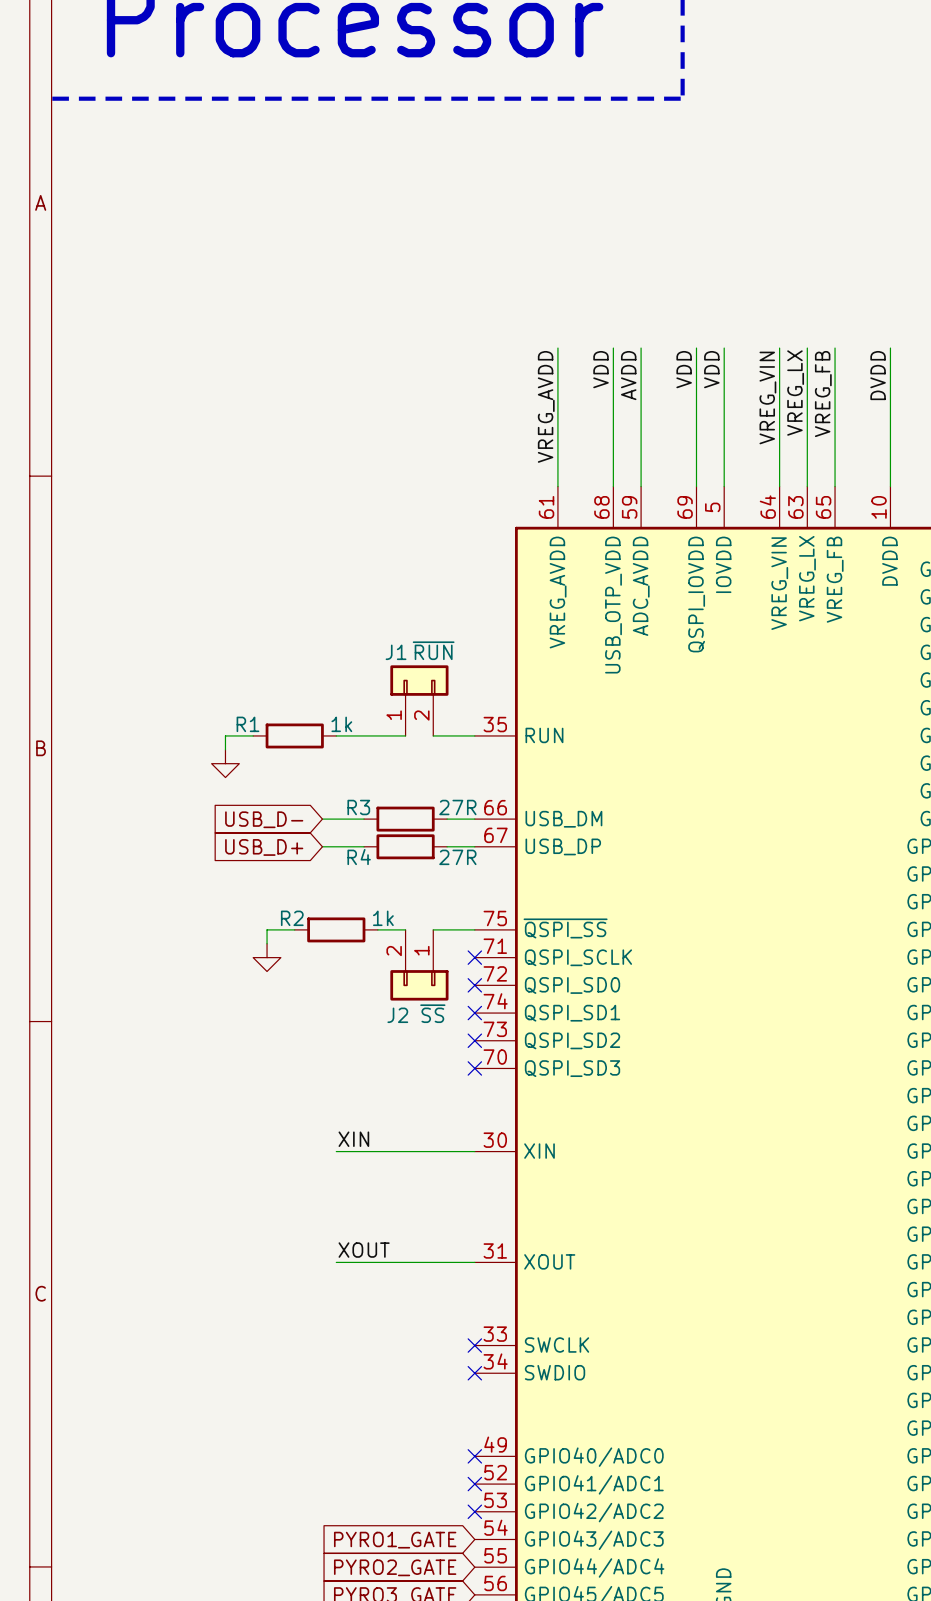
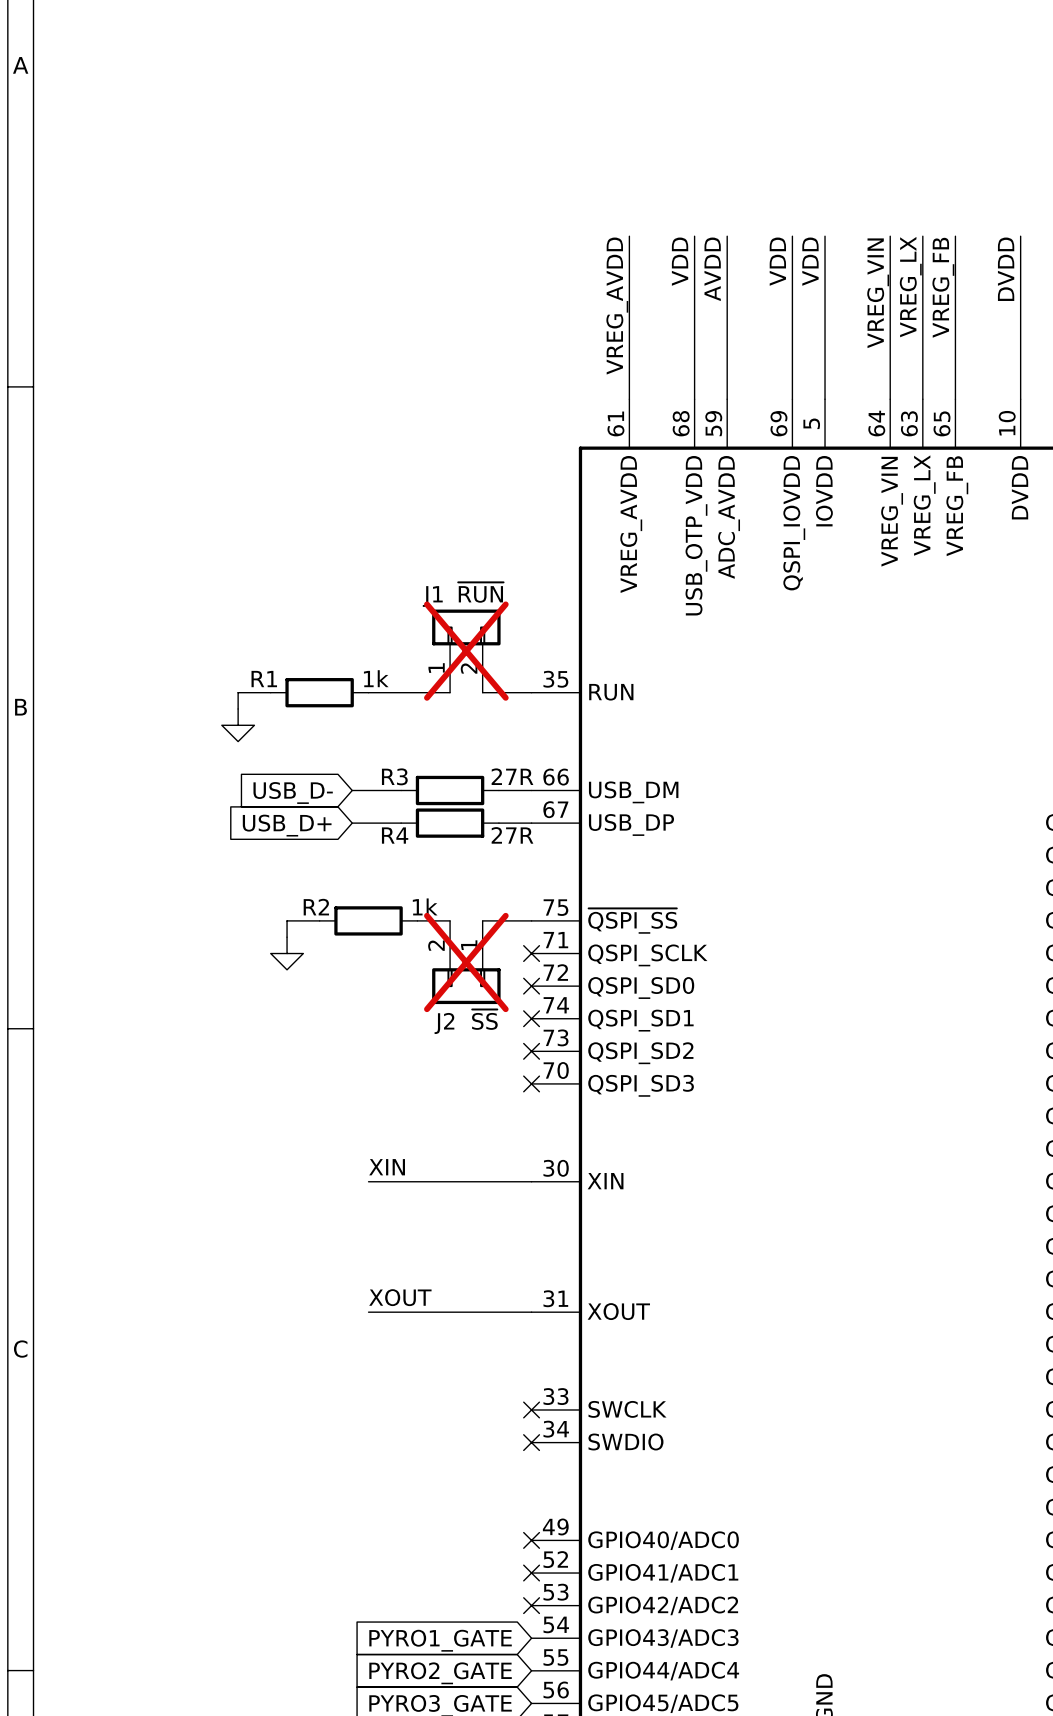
J1 do-not-place cross: none -> (466, 651)
J2 do-not-place cross: none -> (466, 962)

